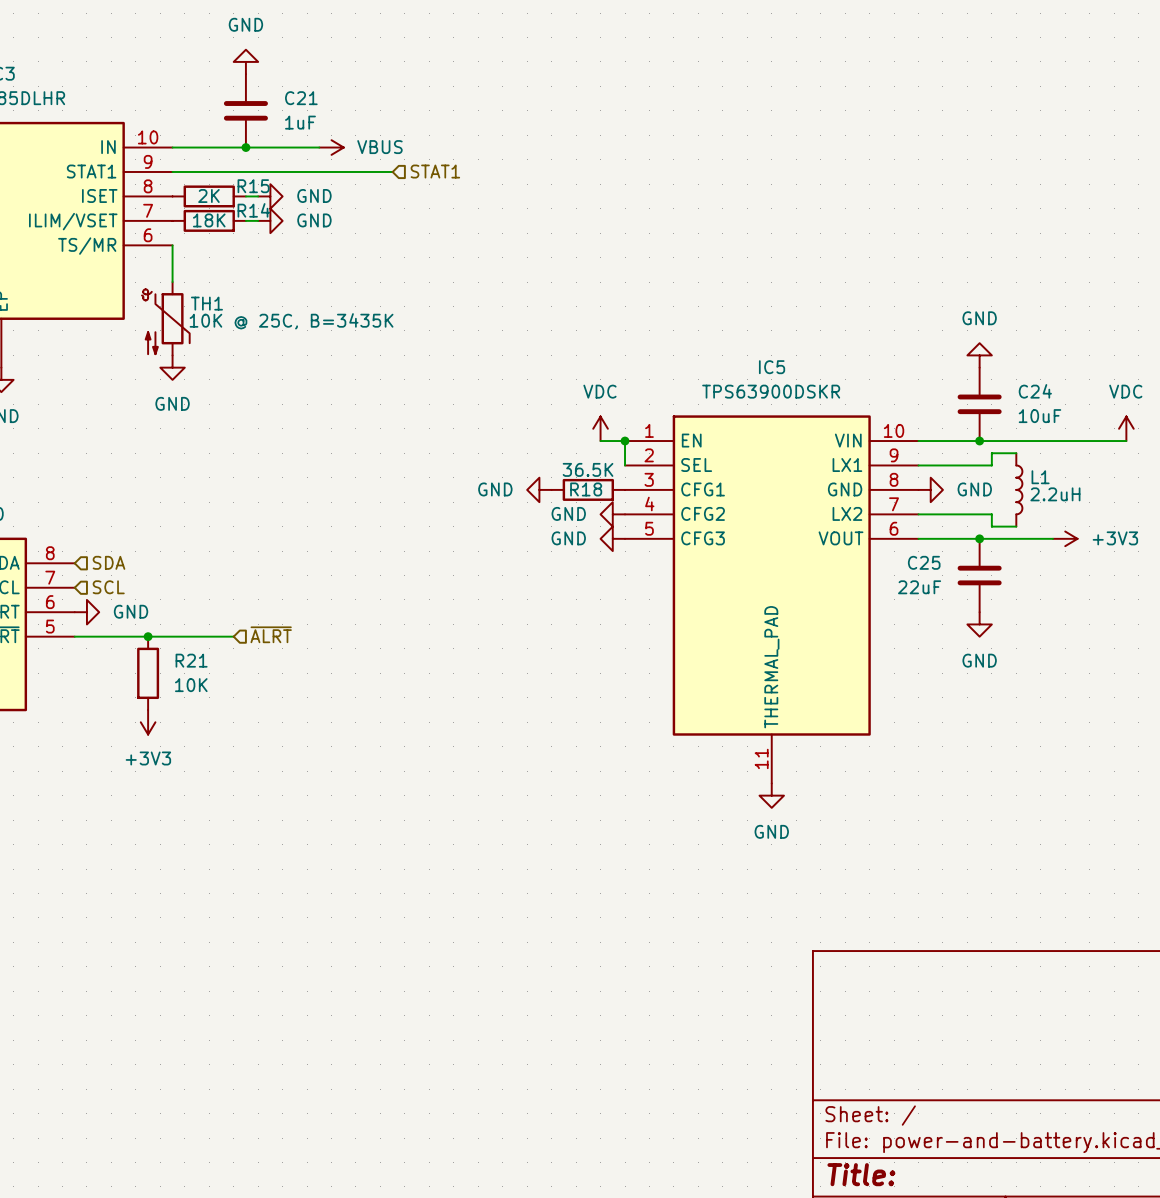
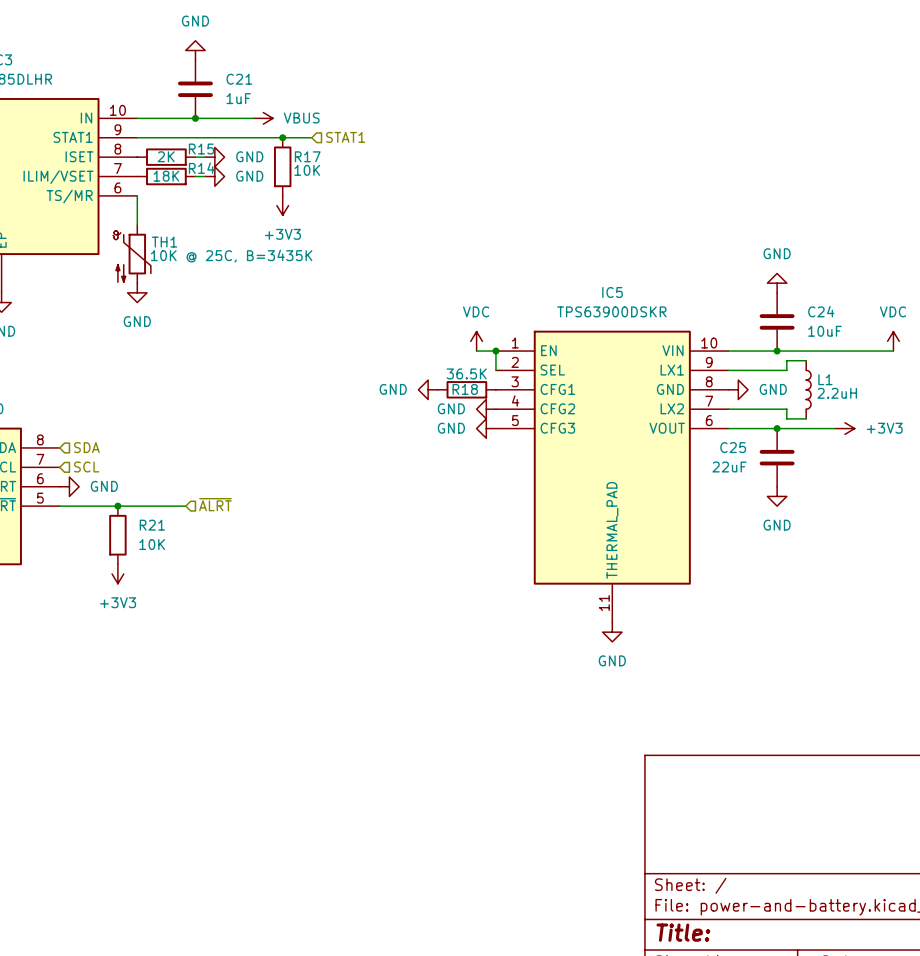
junction: none -> (282, 137)
R17: none -> 10K (282, 166)
power symbol: none -> +3V3 (282, 205)

